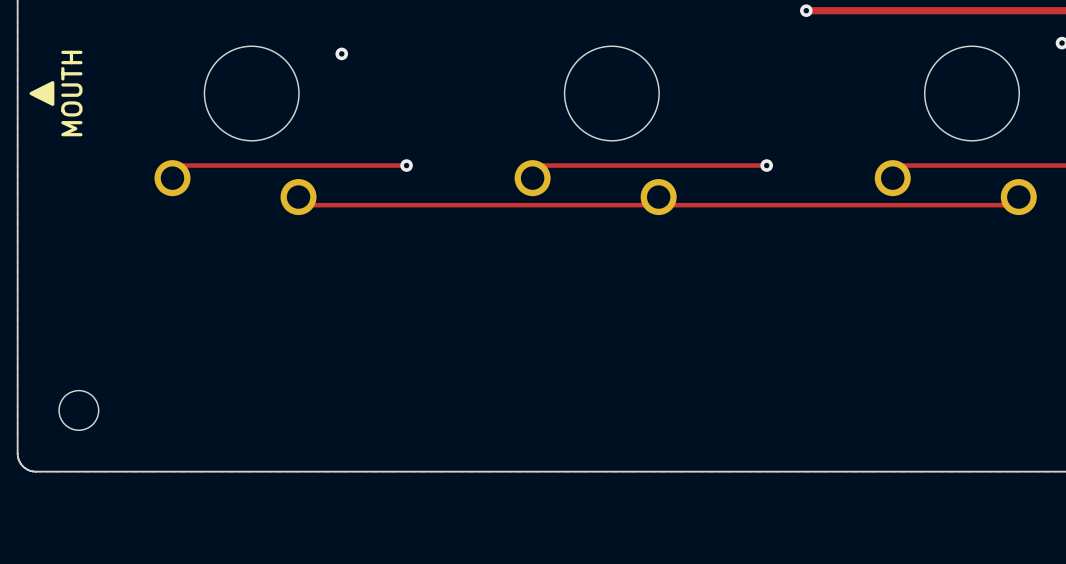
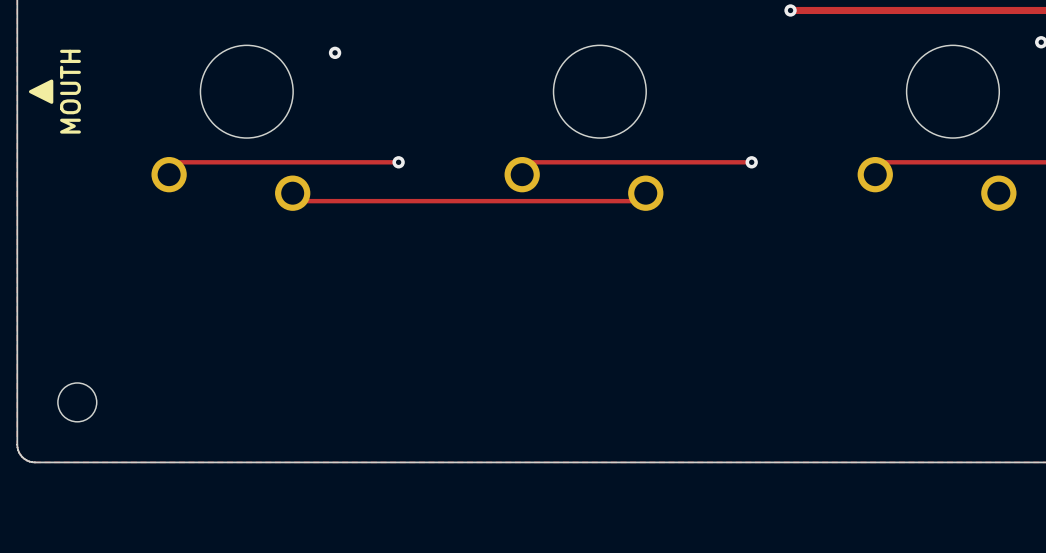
track: (673, 205) (1004, 205) -> none

